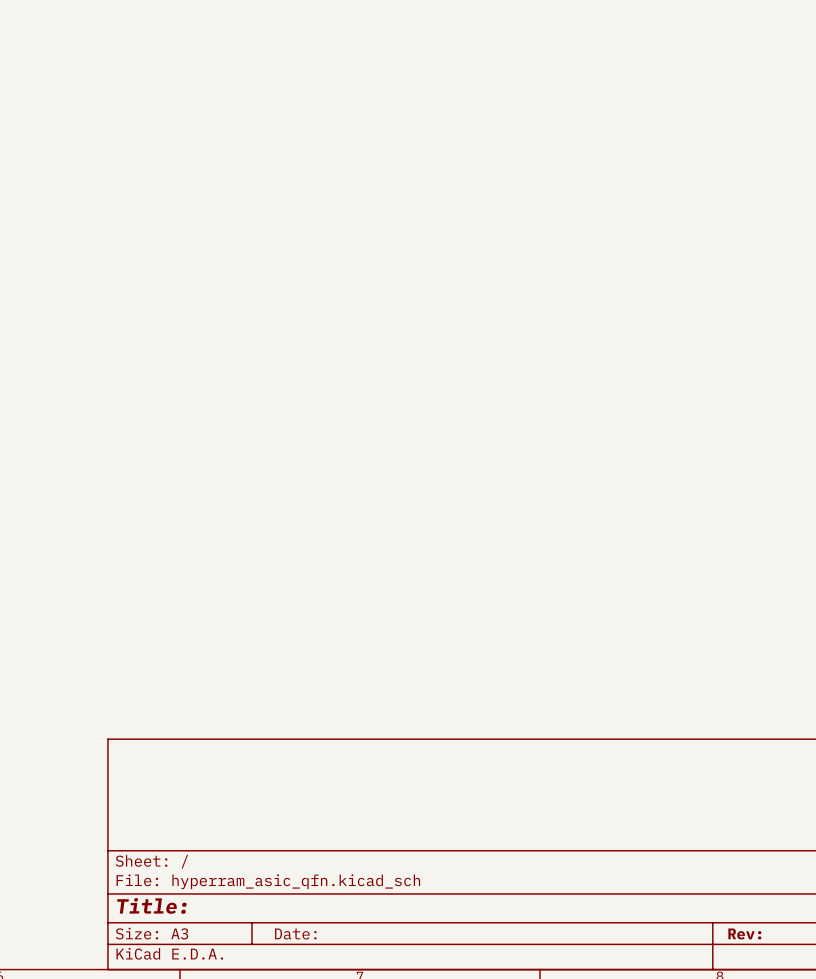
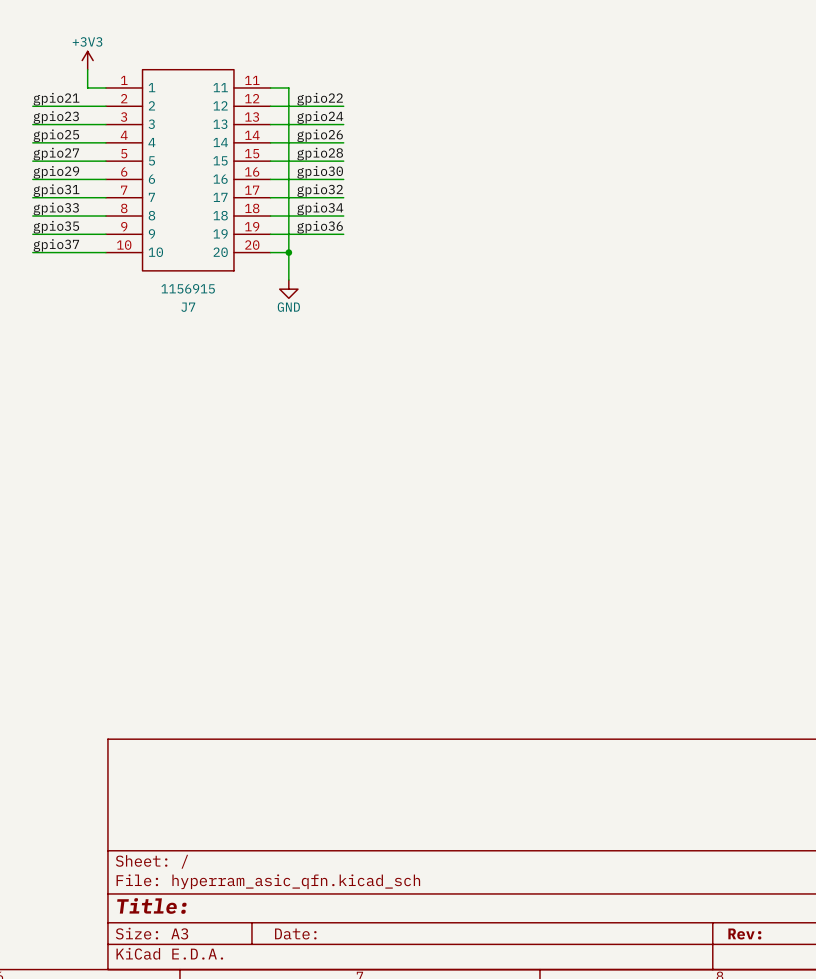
power symbol: none -> +3V3 (87, 60)
wire: none -> (87, 69) (87, 87) (105, 87)
wire: none -> (270, 87) (288, 87) (288, 280)
label: none -> gpio21 (56, 99)
label: none -> gpio22 (320, 99)
wire: none -> (32, 106) (105, 106)
wire: none -> (270, 106) (343, 106)
label: none -> gpio23 (56, 117)
label: none -> gpio24 (320, 117)
wire: none -> (32, 124) (105, 124)
wire: none -> (270, 124) (343, 124)
label: none -> gpio25 (56, 135)
label: none -> gpio26 (320, 135)
wire: none -> (32, 142) (105, 142)
wire: none -> (270, 142) (343, 142)
label: none -> gpio27 (56, 154)
label: none -> gpio28 (320, 154)
wire: none -> (32, 161) (105, 161)
wire: none -> (270, 161) (343, 161)
J7: none -> 1156915 (188, 170)
label: none -> gpio29 (56, 172)
label: none -> gpio30 (320, 172)
wire: none -> (32, 179) (105, 179)
wire: none -> (270, 179) (343, 179)
label: none -> gpio31 (56, 190)
label: none -> gpio32 (320, 190)
wire: none -> (32, 197) (105, 197)
wire: none -> (270, 197) (343, 197)
label: none -> gpio33 (56, 208)
label: none -> gpio34 (320, 208)
wire: none -> (32, 216) (105, 216)
wire: none -> (270, 216) (343, 216)
label: none -> gpio35 (56, 227)
label: none -> gpio36 (320, 227)
wire: none -> (32, 234) (105, 234)
wire: none -> (270, 234) (343, 234)
label: none -> gpio37 (56, 245)
wire: none -> (32, 252) (105, 252)
wire: none -> (270, 252) (288, 252)
junction: none -> (288, 252)
power symbol: none -> GND (288, 289)

